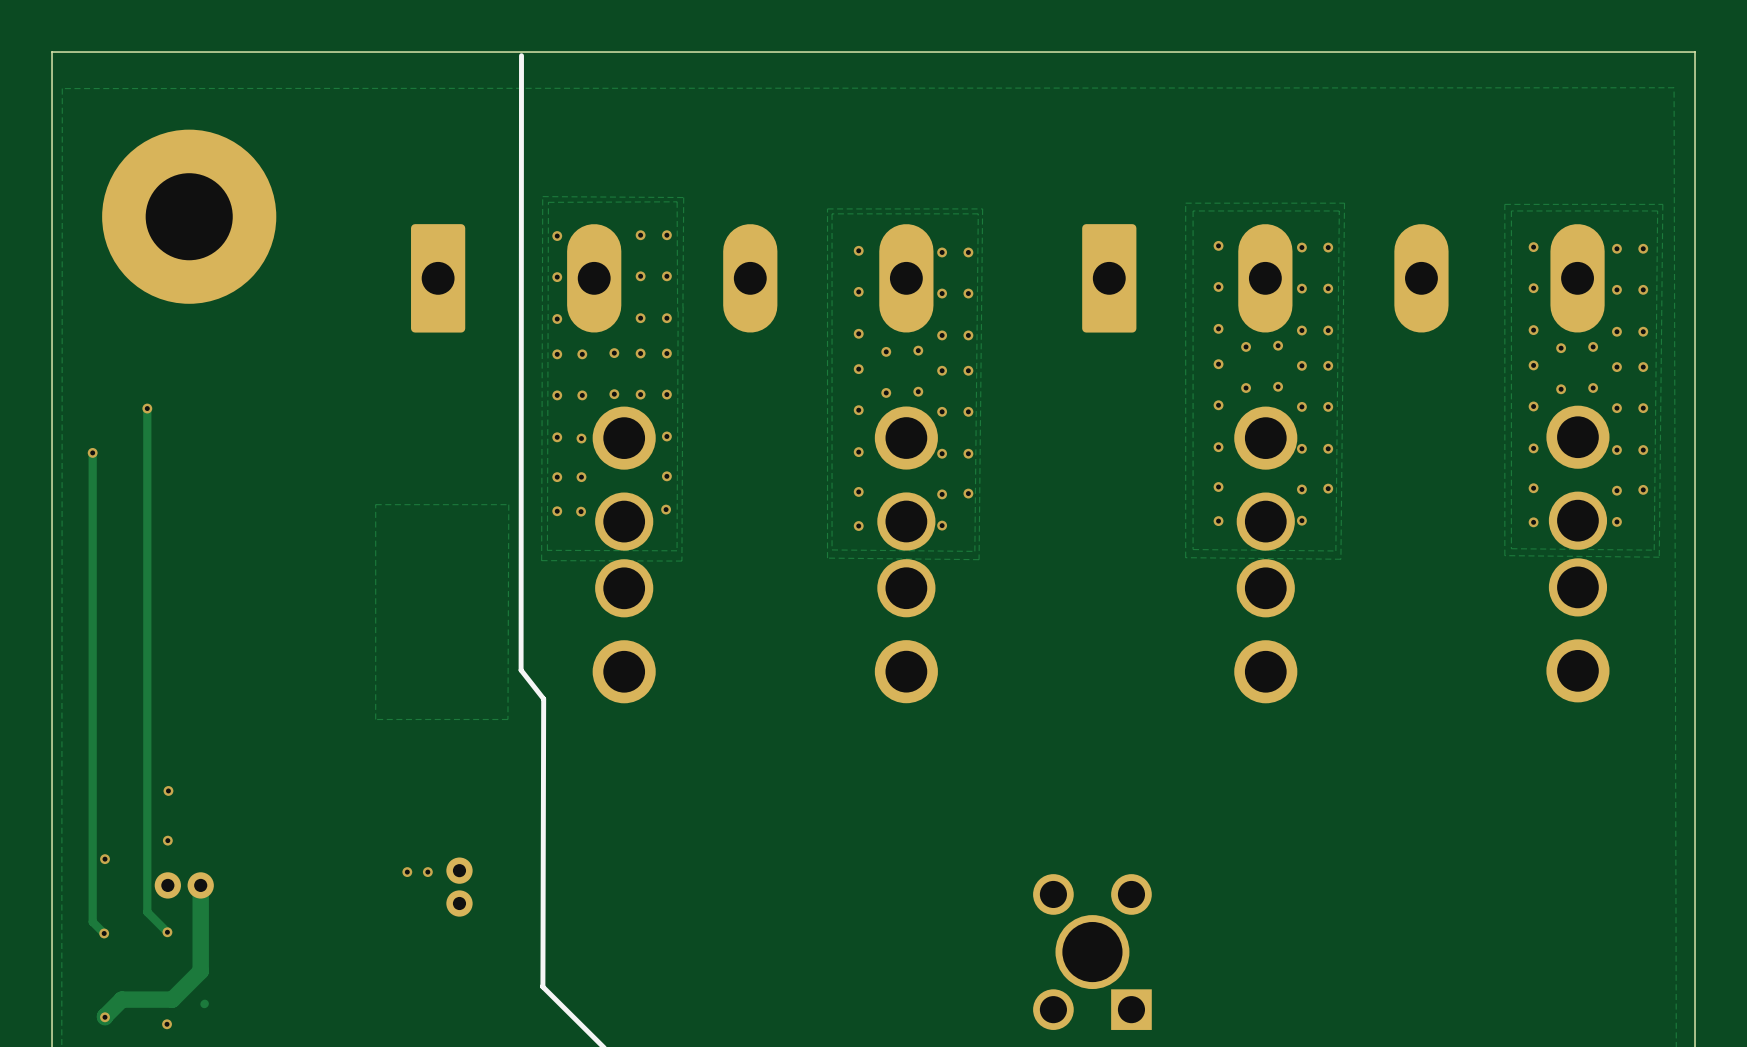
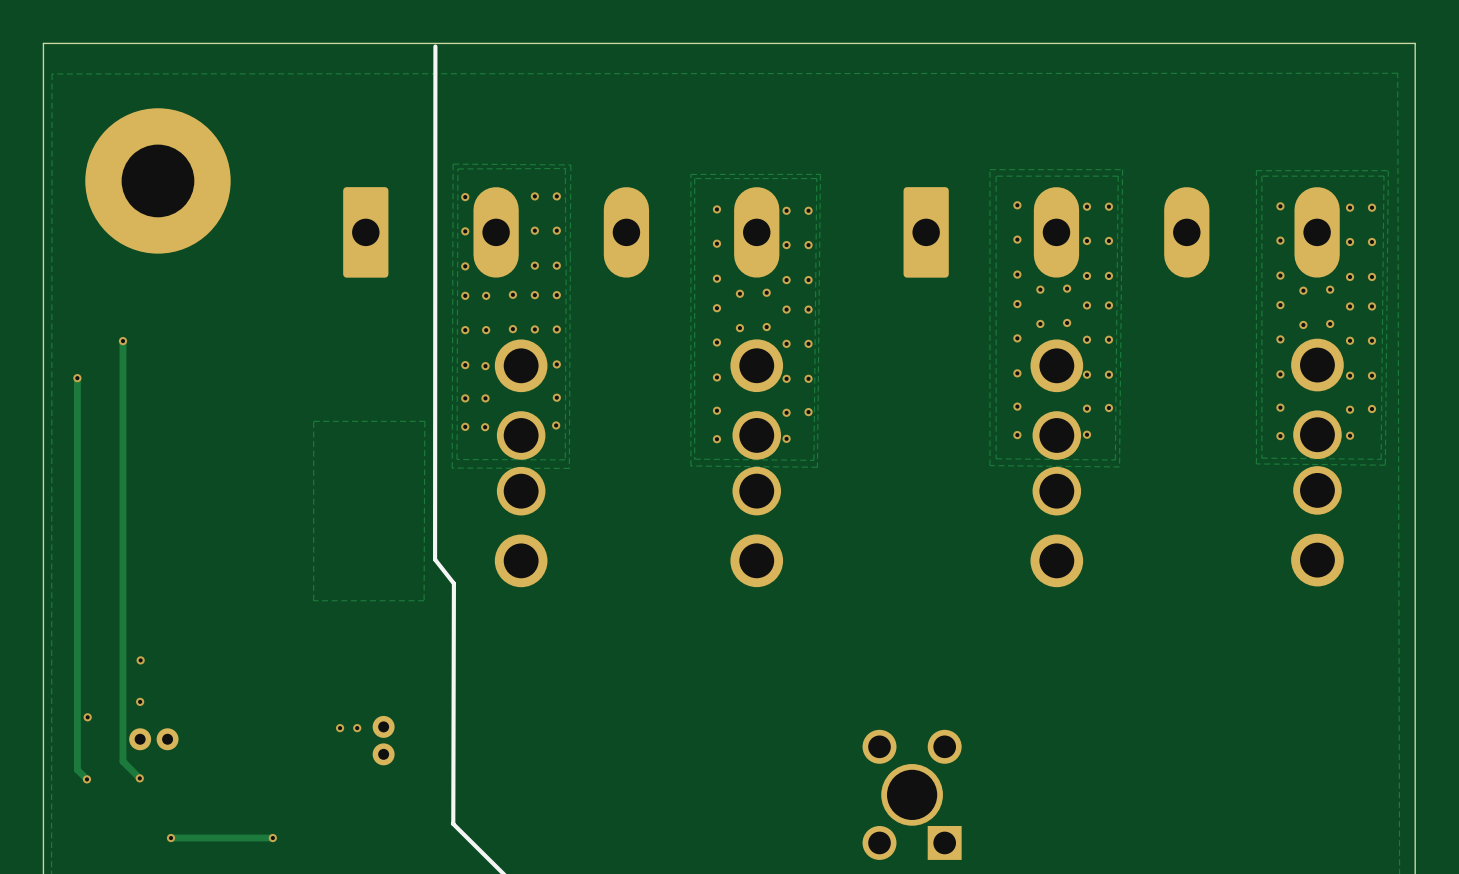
track: (200, 885) (200, 971) (172, 999) (121, 999) (105, 1017) -> none
track: none -> (272, 838) (171, 838)
via: none -> (272, 838)
via: (105, 1017) -> none
via position: (167, 1024) -> (171, 838)

